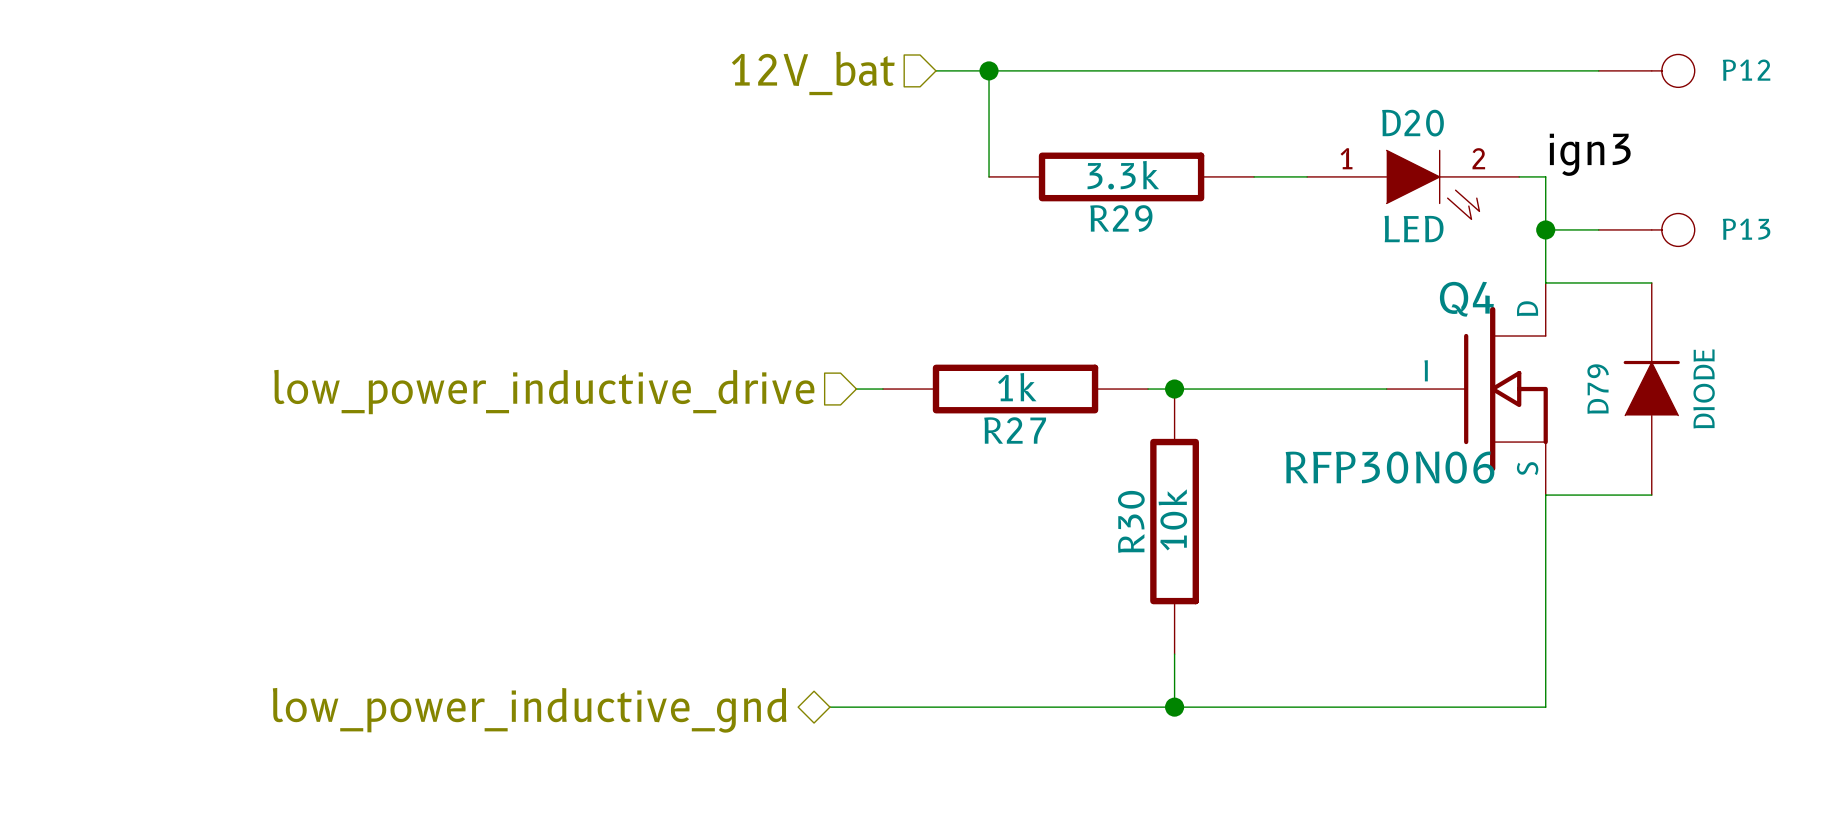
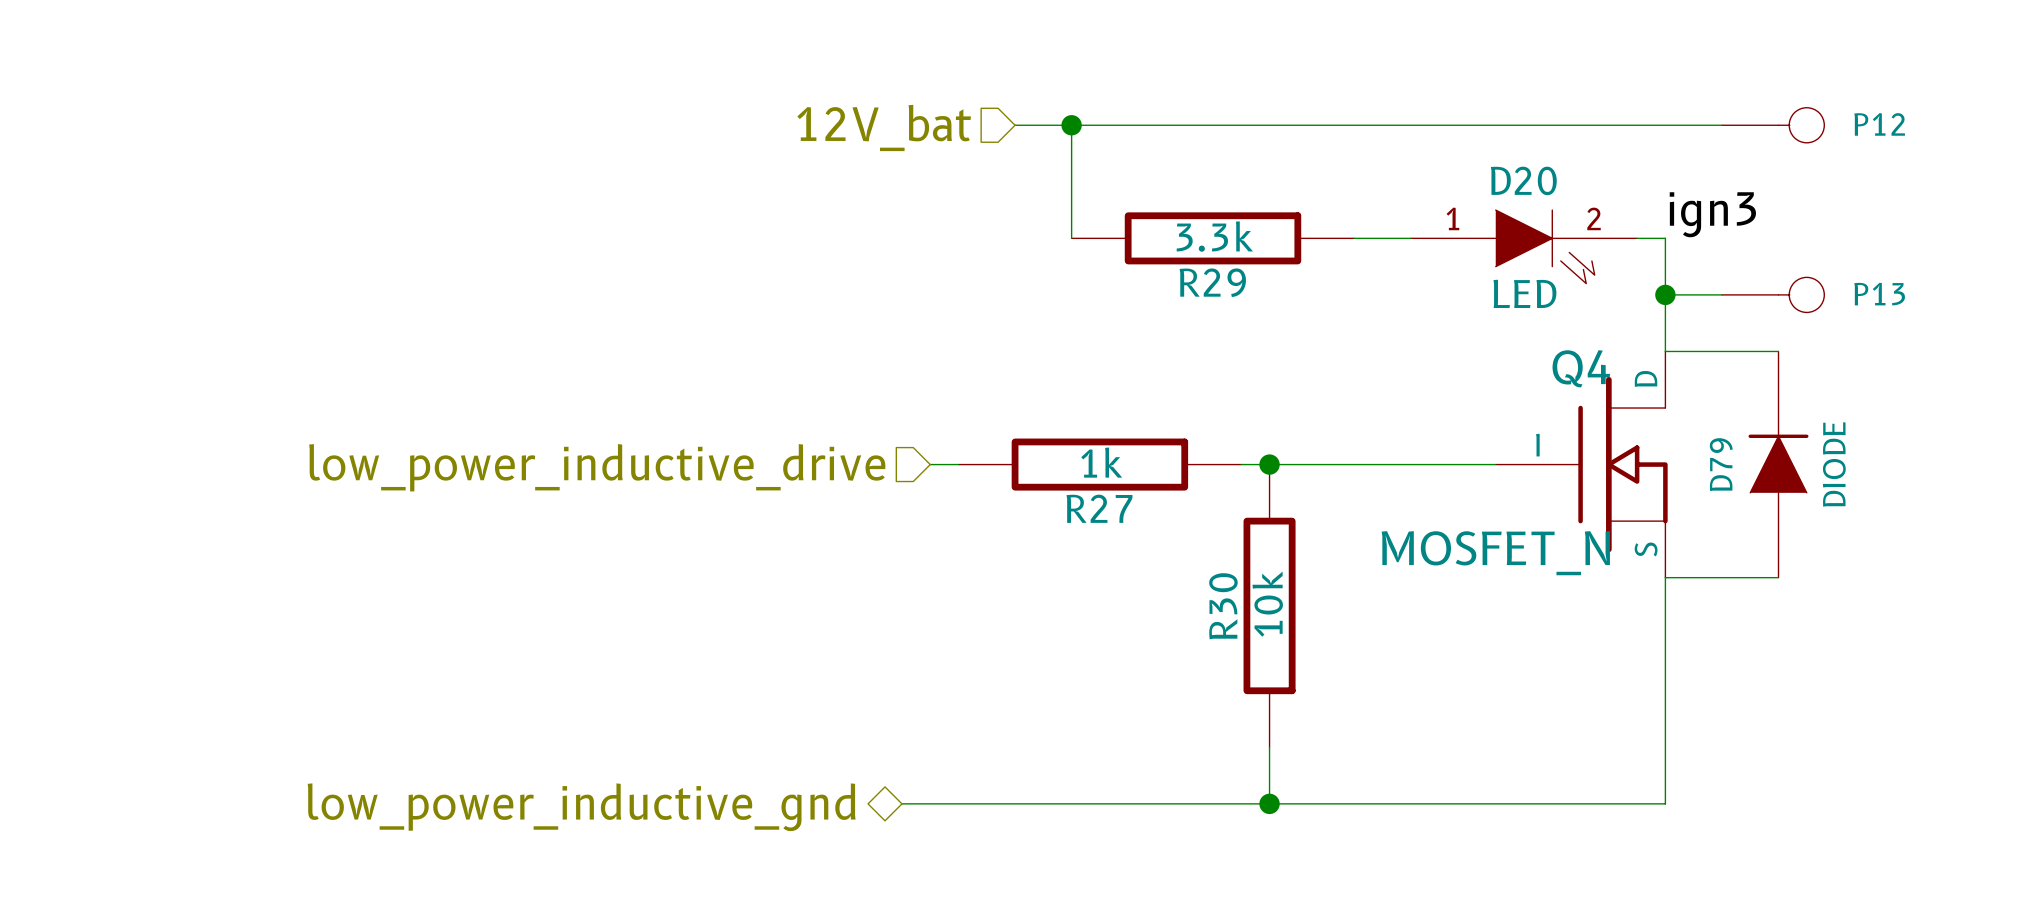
Q4 value: RFP30N06 (1390, 467) -> MOSFET_N (1495, 553)

